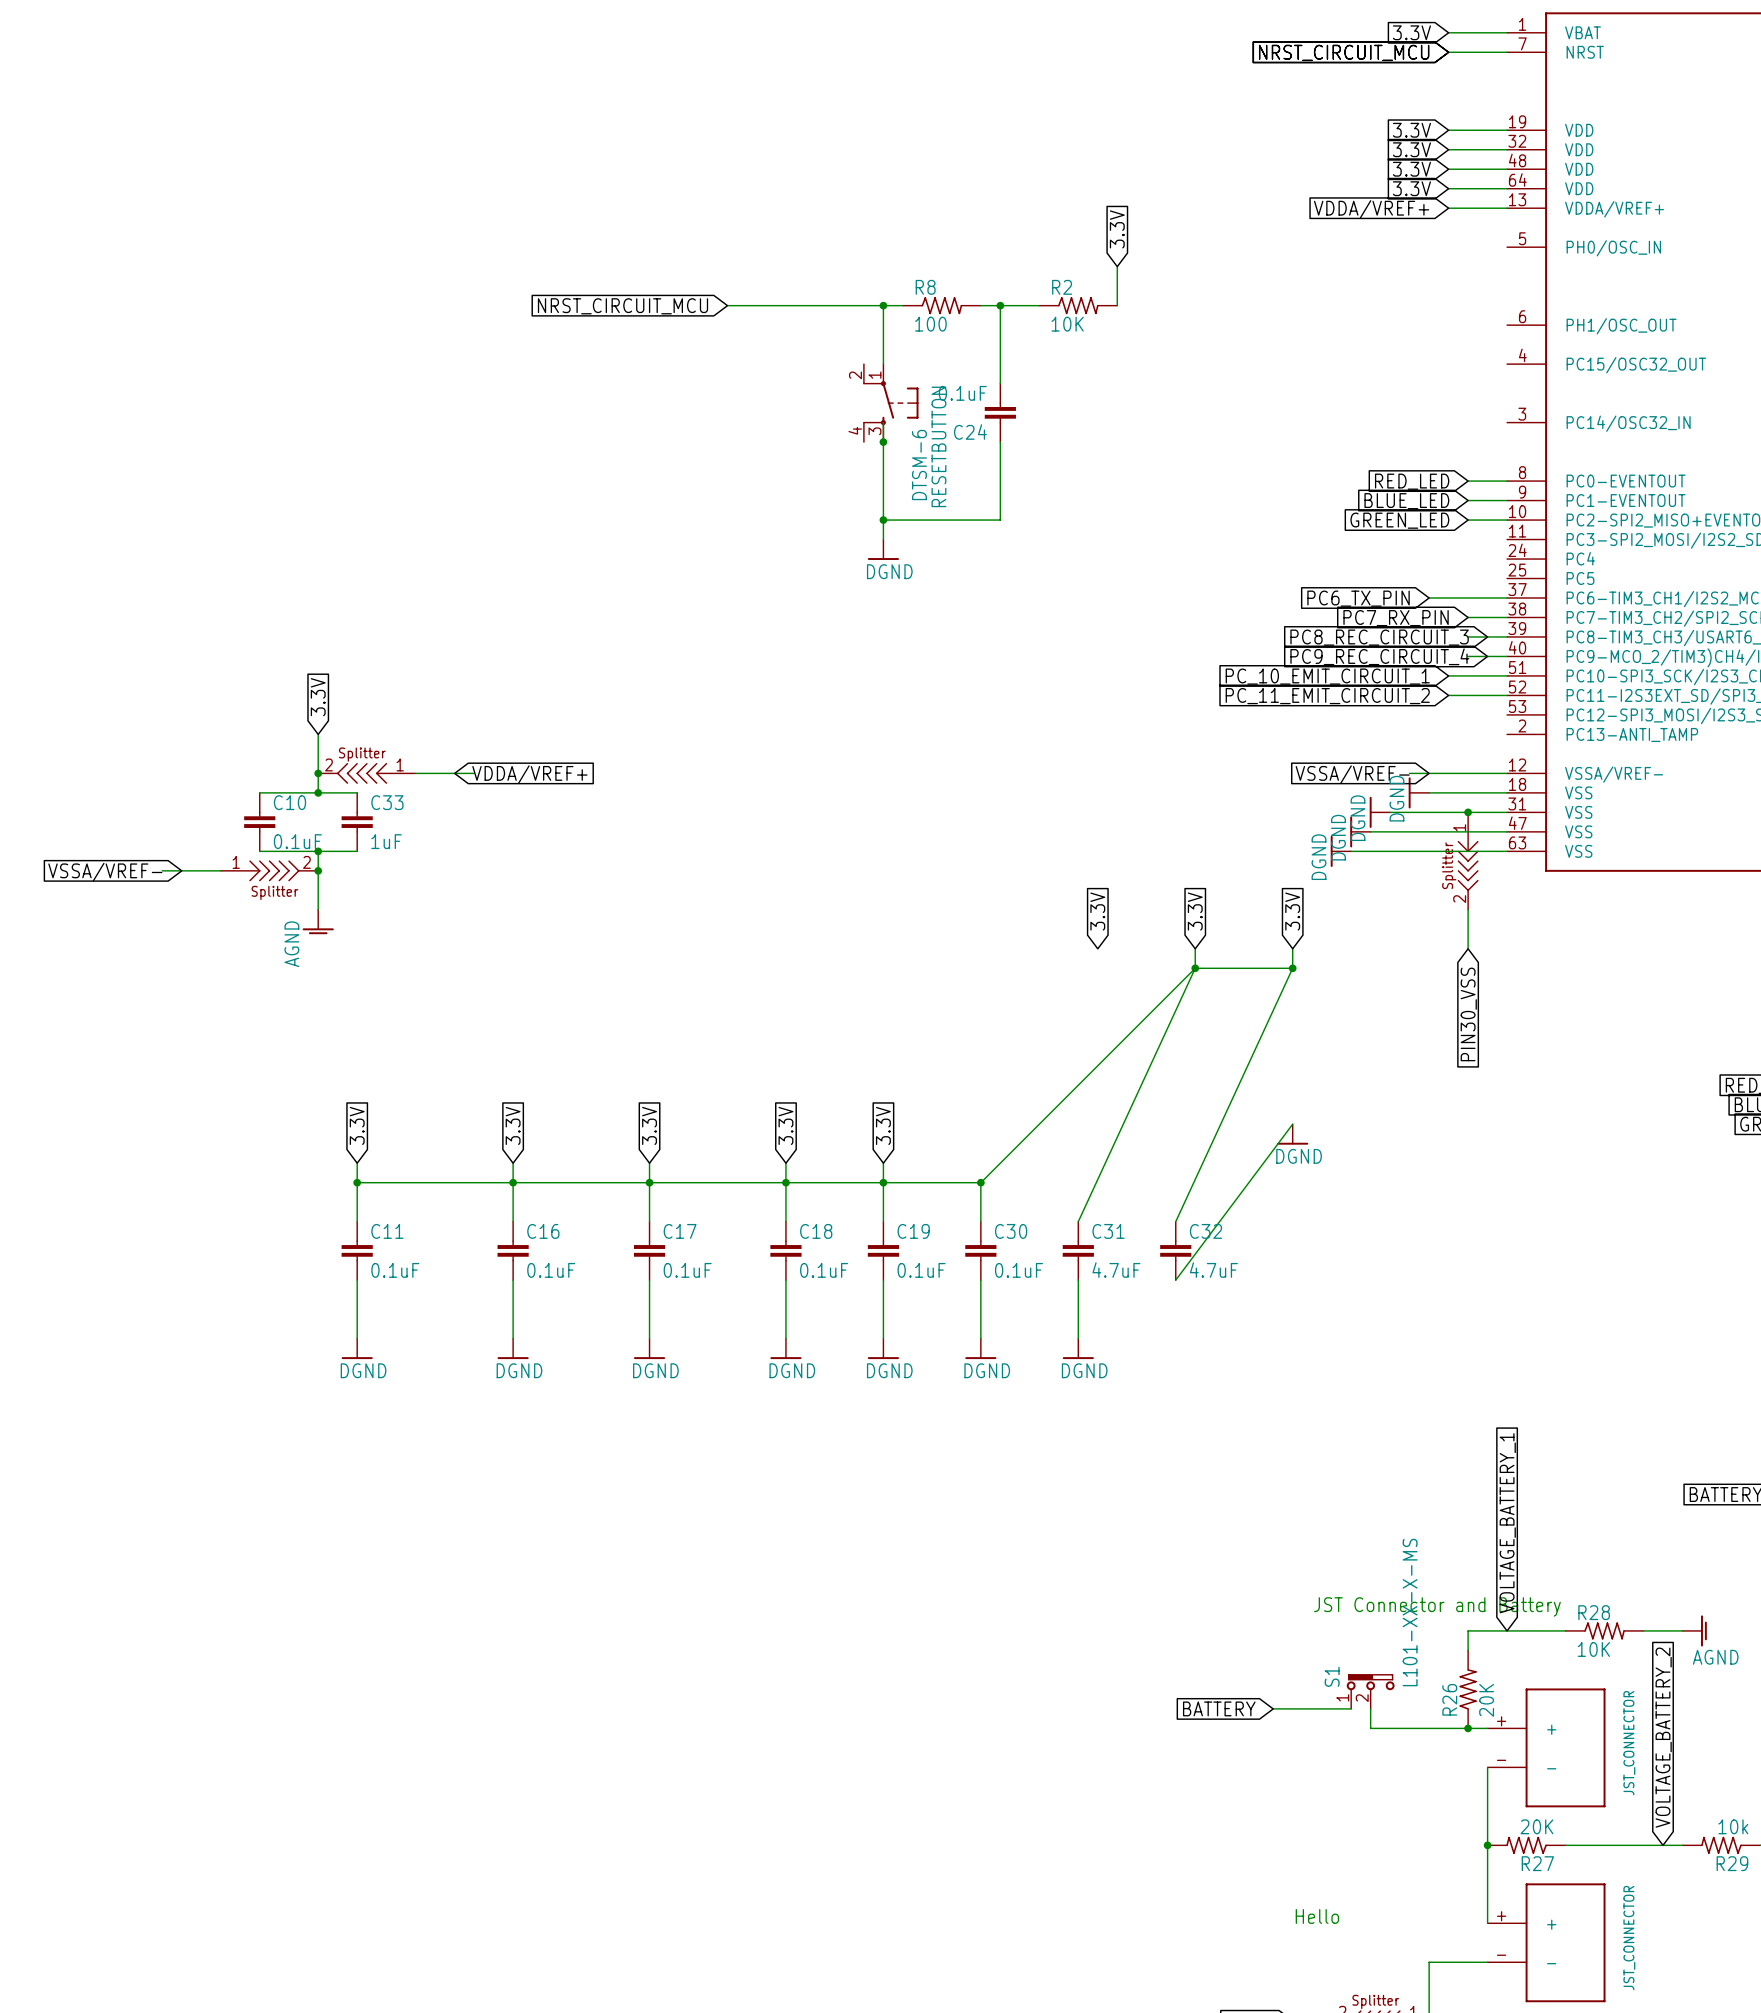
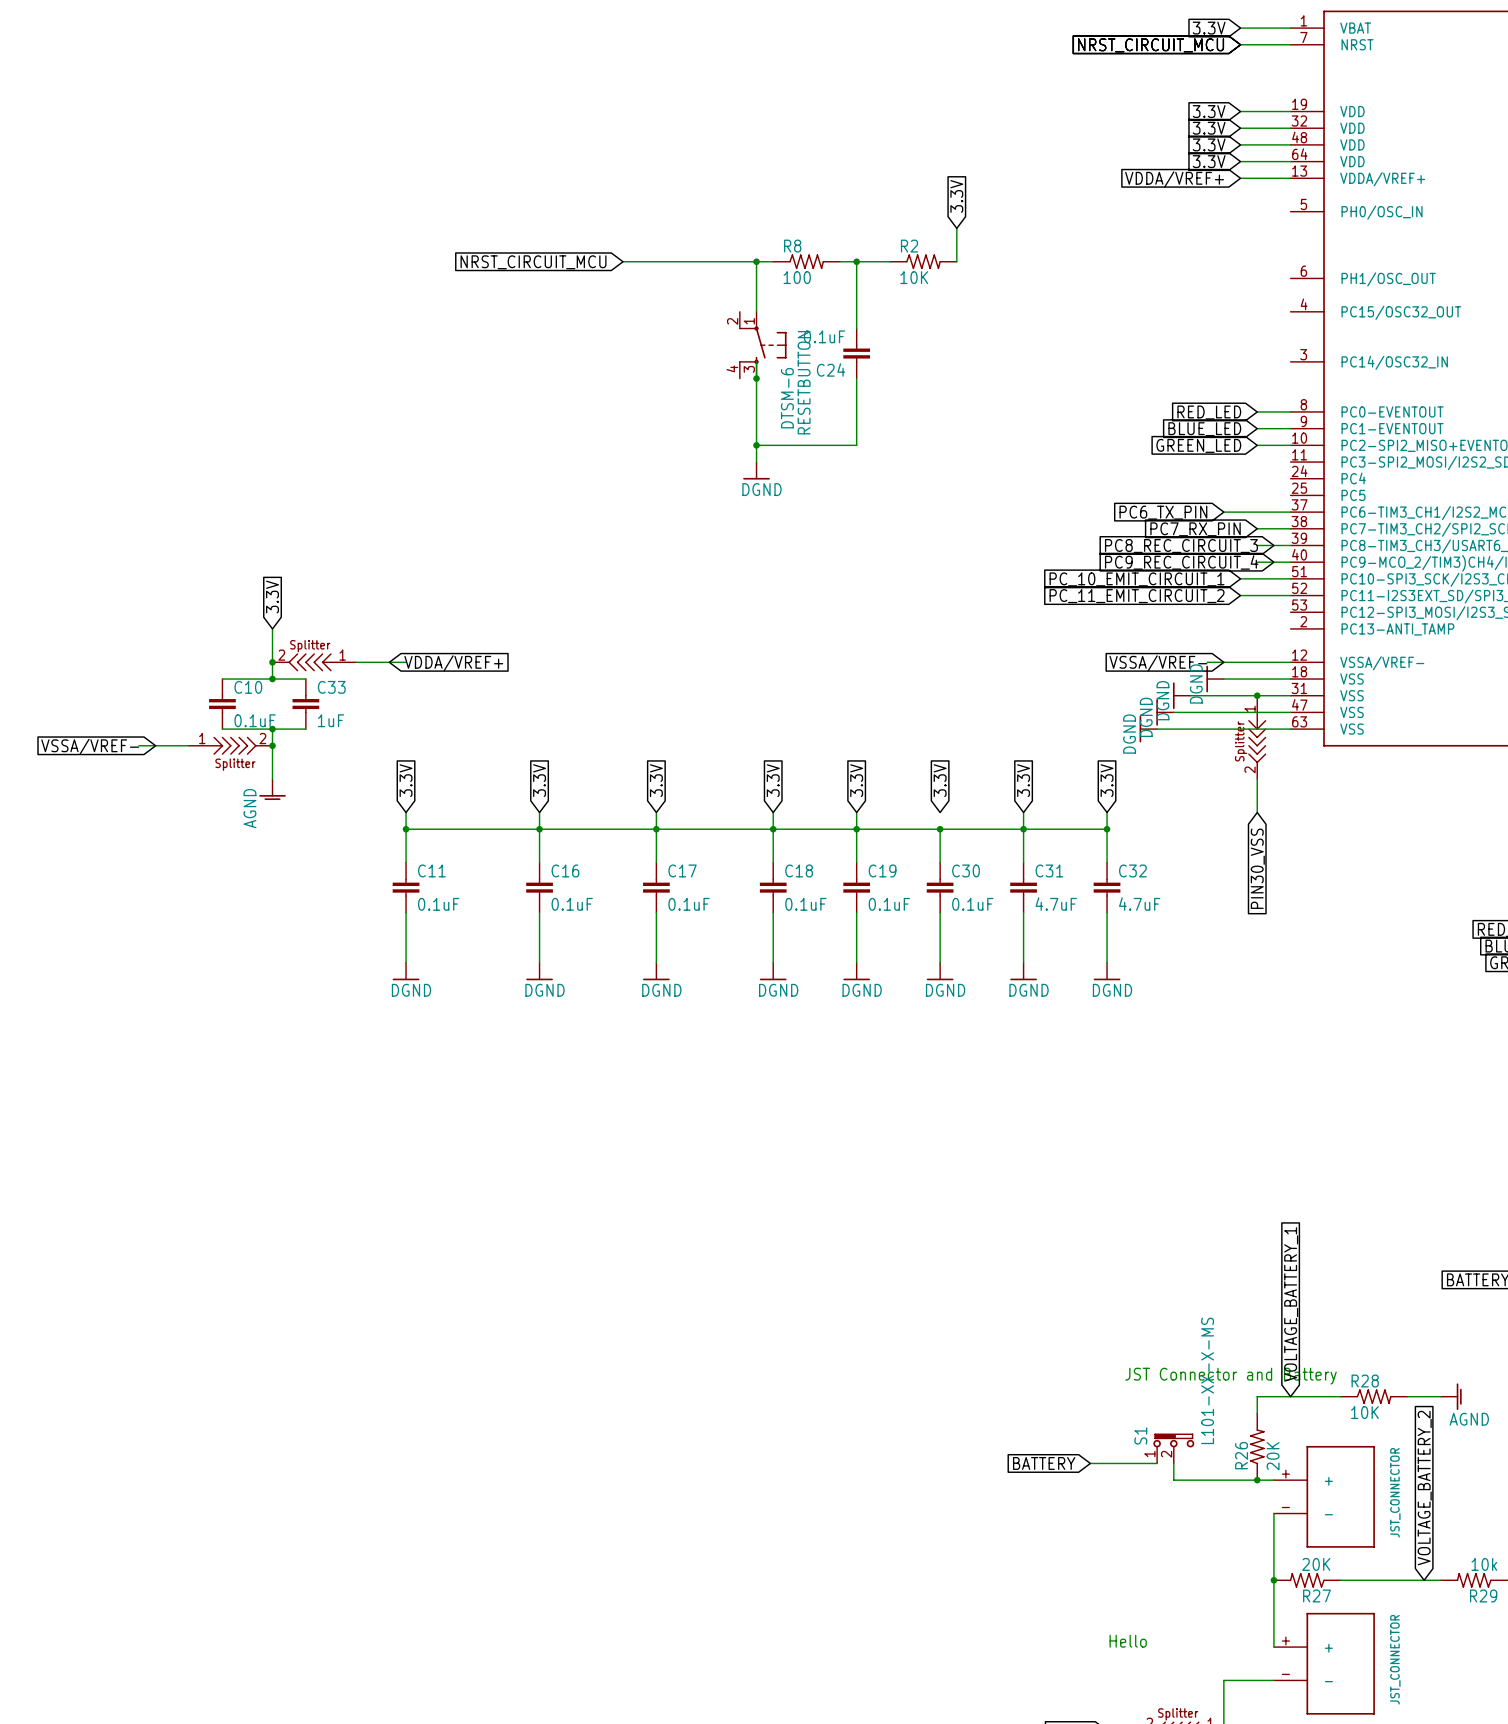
global label: none -> 3.3V (406, 780)
global label: none -> 3.3V (539, 780)
global label: none -> 3.3V (656, 780)
global label: none -> 3.3V (773, 780)
global label: none -> 3.3V (856, 780)
wire: none -> (406, 812) (406, 862)
wire: none -> (539, 812) (539, 862)
wire: none -> (656, 812) (656, 862)
wire: none -> (773, 812) (773, 862)
wire: none -> (856, 812) (856, 862)
wire: none -> (406, 829) (1023, 829) (1023, 862)
junction: none -> (406, 829)
junction: none -> (539, 829)
junction: none -> (656, 829)
junction: none -> (773, 829)
junction: none -> (856, 829)
wire: none -> (940, 829) (940, 862)
junction: none -> (940, 829)
wire: (1292, 968) (1175, 1221) -> (1107, 829) (1107, 862)
wire: none -> (940, 912) (940, 962)
wire: none -> (1023, 912) (1023, 962)
wire: (1292, 1124) (1175, 1280) -> (1107, 962) (1107, 912)
global label: 3.3V (357, 1125) -> none
global label: 3.3V (513, 1125) -> none
global label: 3.3V (649, 1125) -> none
global label: 3.3V (785, 1125) -> none
global label: 3.3V (883, 1125) -> none
power symbol: none -> DGND (406, 971)
power symbol: none -> DGND (539, 971)
power symbol: none -> DGND (656, 971)
power symbol: none -> DGND (773, 971)
power symbol: none -> DGND (856, 971)
power symbol: none -> DGND (940, 971)
power symbol: none -> DGND (1023, 971)
wire: (357, 1163) (357, 1221) -> (406, 912) (406, 962)
wire: (513, 1163) (513, 1221) -> (539, 912) (539, 962)
wire: (649, 1163) (649, 1221) -> (656, 912) (656, 962)
wire: (785, 1163) (785, 1221) -> (773, 912) (773, 962)
wire: (883, 1163) (883, 1221) -> (856, 912) (856, 962)
wire: (357, 1182) (980, 1182) -> none
junction: (357, 1182) -> none
junction: (513, 1182) -> none
junction: (649, 1182) -> none
junction: (785, 1182) -> none
junction: (883, 1182) -> none
wire: (980, 1182) (980, 1221) -> none
wire: (980, 1182) (1195, 968) (1078, 1221) -> none
junction: (980, 1182) -> none
C11 position: (357, 1250) -> (406, 887)
C16 position: (513, 1250) -> (539, 887)
C17 position: (649, 1250) -> (656, 887)
C18 position: (785, 1250) -> (773, 887)
C19 position: (883, 1250) -> (856, 887)
C30 position: (980, 1250) -> (940, 887)
C31 position: (1078, 1250) -> (1023, 887)
C32 position: (1175, 1250) -> (1107, 887)
wire: (357, 1280) (357, 1338) -> none
wire: (513, 1280) (513, 1338) -> none
wire: (649, 1280) (649, 1338) -> none
wire: (785, 1280) (785, 1338) -> none
wire: (883, 1280) (883, 1338) -> none
wire: (980, 1280) (980, 1338) -> none
wire: (1078, 1280) (1078, 1338) -> none
power symbol: DGND (357, 1348) -> none
power symbol: DGND (513, 1348) -> none
power symbol: DGND (649, 1348) -> none
power symbol: DGND (785, 1348) -> none
power symbol: DGND (883, 1348) -> none
power symbol: DGND (980, 1348) -> none
power symbol: DGND (1078, 1348) -> none

